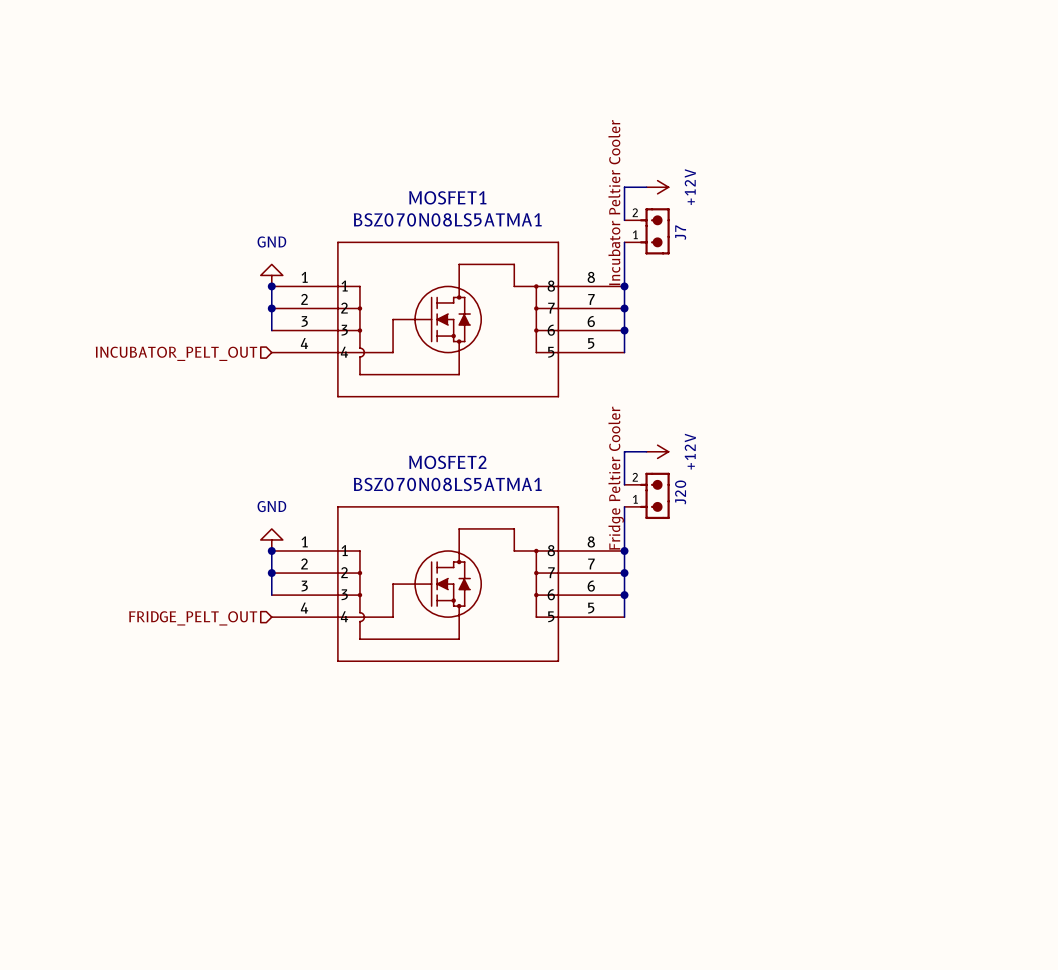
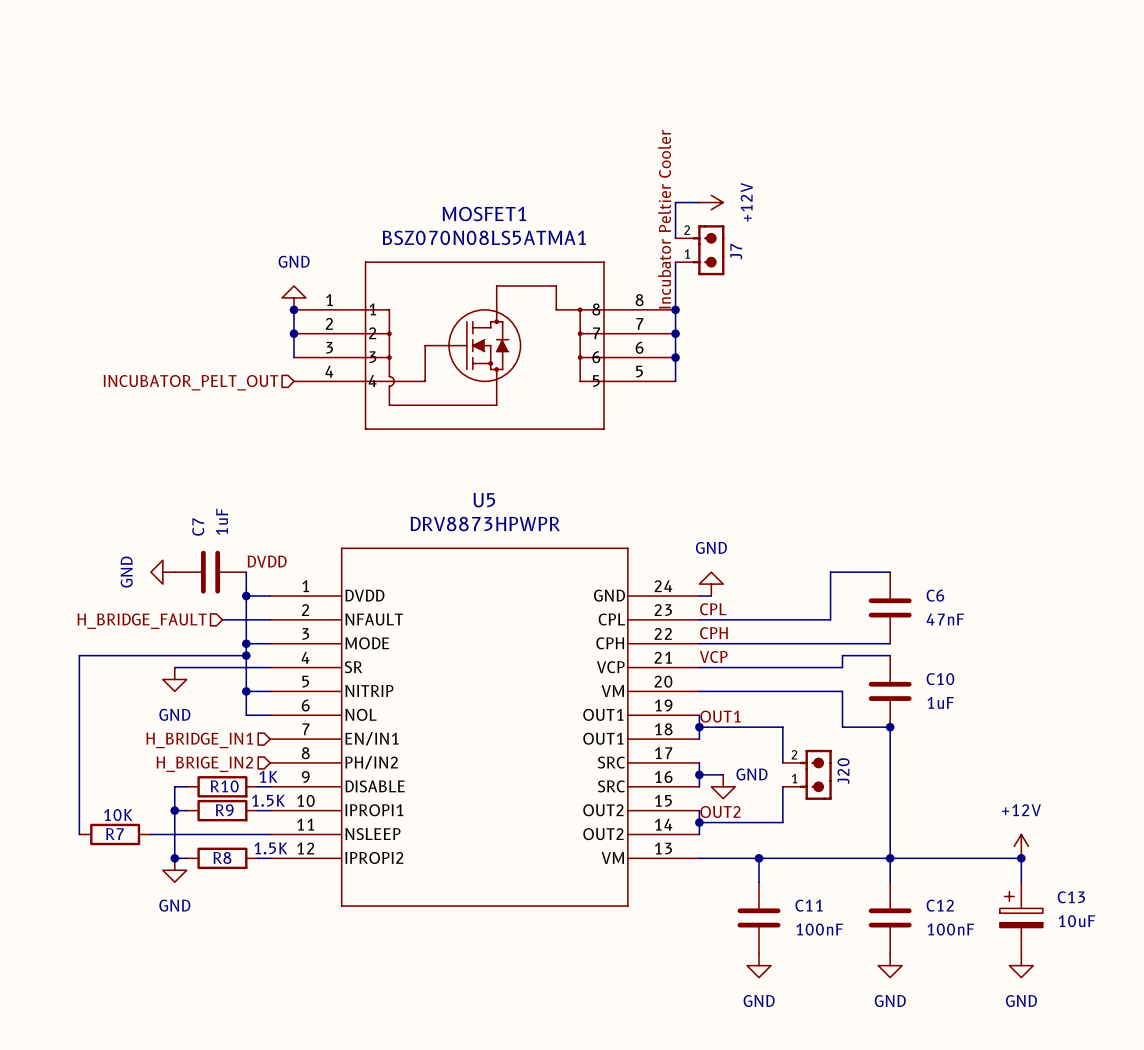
wire: (646, 451) (624, 451) (624, 484) -> none
power symbol: +12V (657, 451) -> none
label: Fridge Peltier Cooler (616, 478) -> none
J20 position: (647, 495) -> (807, 774)
wire: (624, 506) (624, 617) -> none
label: none -> DVDD (267, 561)
power symbol: none -> GND (162, 572)
C7: none -> 1uF (210, 572)
wire: none -> (246, 572) (246, 715) (270, 715)
wire: none -> (890, 572) (830, 572) (830, 619) (699, 619)
power symbol: GND (271, 539) -> none
power symbol: none -> GND (711, 584)
wire: none -> (246, 596) (270, 596)
junction: none -> (246, 596)
wire: (271, 550) (271, 595) -> none
junction: (271, 550) -> none
junction: (624, 550) -> none
wire: none -> (699, 596) (711, 596)
C6: none -> 47nF (890, 607)
label: none -> CPL (713, 609)
wire: none -> (222, 619) (270, 619)
junction: (271, 573) -> none
junction: (624, 573) -> none
hierarchical label: none -> H_BRIDGE_FAULT (142, 621)
MOSFET2: BSZ070N08LS5ATMA1 (448, 584) -> none
label: none -> CPH (713, 633)
wire: none -> (246, 643) (270, 643)
junction: none -> (246, 643)
junction: (624, 595) -> none
wire: none -> (699, 643) (890, 643)
wire: none -> (246, 655) (79, 655) (79, 834)
junction: none -> (246, 655)
wire: none -> (890, 655) (842, 655) (842, 667) (699, 667)
label: none -> VCP (713, 657)
wire: none -> (174, 667) (270, 667)
hierarchical label: FRIDGE_PELT_OUT (193, 618) -> none
power symbol: none -> GND (174, 679)
wire: none -> (246, 691) (270, 691)
junction: none -> (246, 691)
wire: none -> (699, 691) (842, 691) (842, 727) (890, 727) (890, 882)
C10: none -> 1uF (890, 691)
wire: none -> (699, 715) (699, 739)
label: none -> OUT1 (720, 716)
U5: none -> DRV8873HPWPR (484, 727)
wire: none -> (699, 727) (782, 727) (782, 762)
junction: none -> (699, 727)
junction: none -> (890, 727)
hierarchical label: none -> H_BRIDGE_IN1 (199, 740)
wire: none -> (699, 762) (699, 786)
hierarchical label: none -> H_BRIGE_IN2 (204, 764)
wire: none -> (699, 774) (723, 774)
junction: none -> (699, 774)
wire: none -> (186, 786) (174, 786) (174, 858) (186, 858)
R10: none -> 1K (222, 786)
wire: none -> (258, 786) (270, 786)
power symbol: none -> GND (723, 786)
wire: none -> (782, 786) (782, 822) (699, 822)
wire: none -> (174, 810) (186, 810)
junction: none -> (174, 810)
R9: none -> 1.5K (222, 810)
wire: none -> (258, 810) (270, 810)
wire: none -> (699, 810) (699, 834)
label: none -> OUT2 (720, 811)
junction: none -> (699, 822)
R7: none -> 10K (115, 834)
wire: none -> (150, 834) (270, 834)
power symbol: none -> +12V (1021, 846)
junction: none -> (174, 858)
R8: none -> 1.5K (222, 858)
wire: none -> (258, 858) (270, 858)
wire: none -> (699, 858) (1021, 858) (1021, 882)
wire: none -> (759, 858) (759, 882)
junction: none -> (759, 858)
junction: none -> (890, 858)
junction: none -> (1021, 858)
power symbol: none -> GND (174, 870)
C11: none -> 100nF (759, 917)
C12: none -> 100nF (890, 917)
C13: none -> 10uF (1021, 917)
power symbol: none -> GND (759, 965)
power symbol: none -> GND (890, 965)
power symbol: none -> GND (1021, 965)

